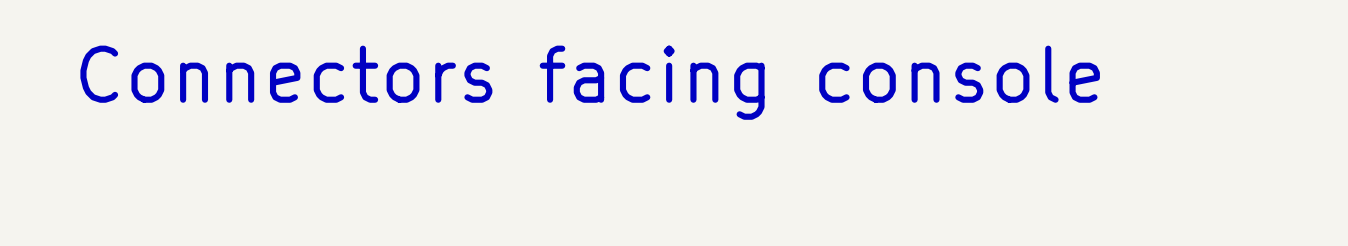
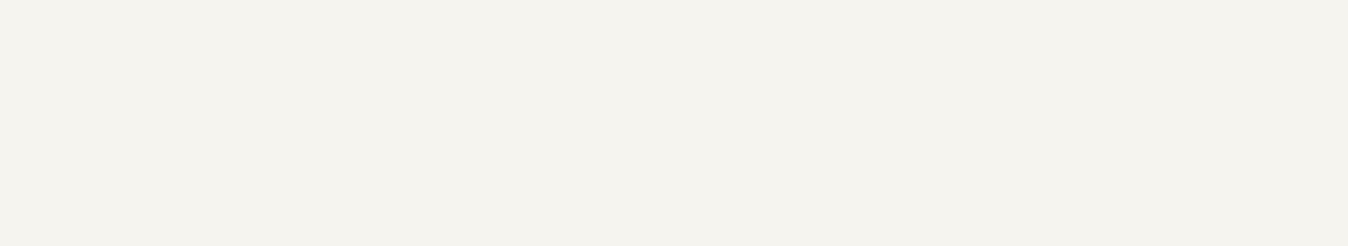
text: Connectors facing console (590, 82) -> none

